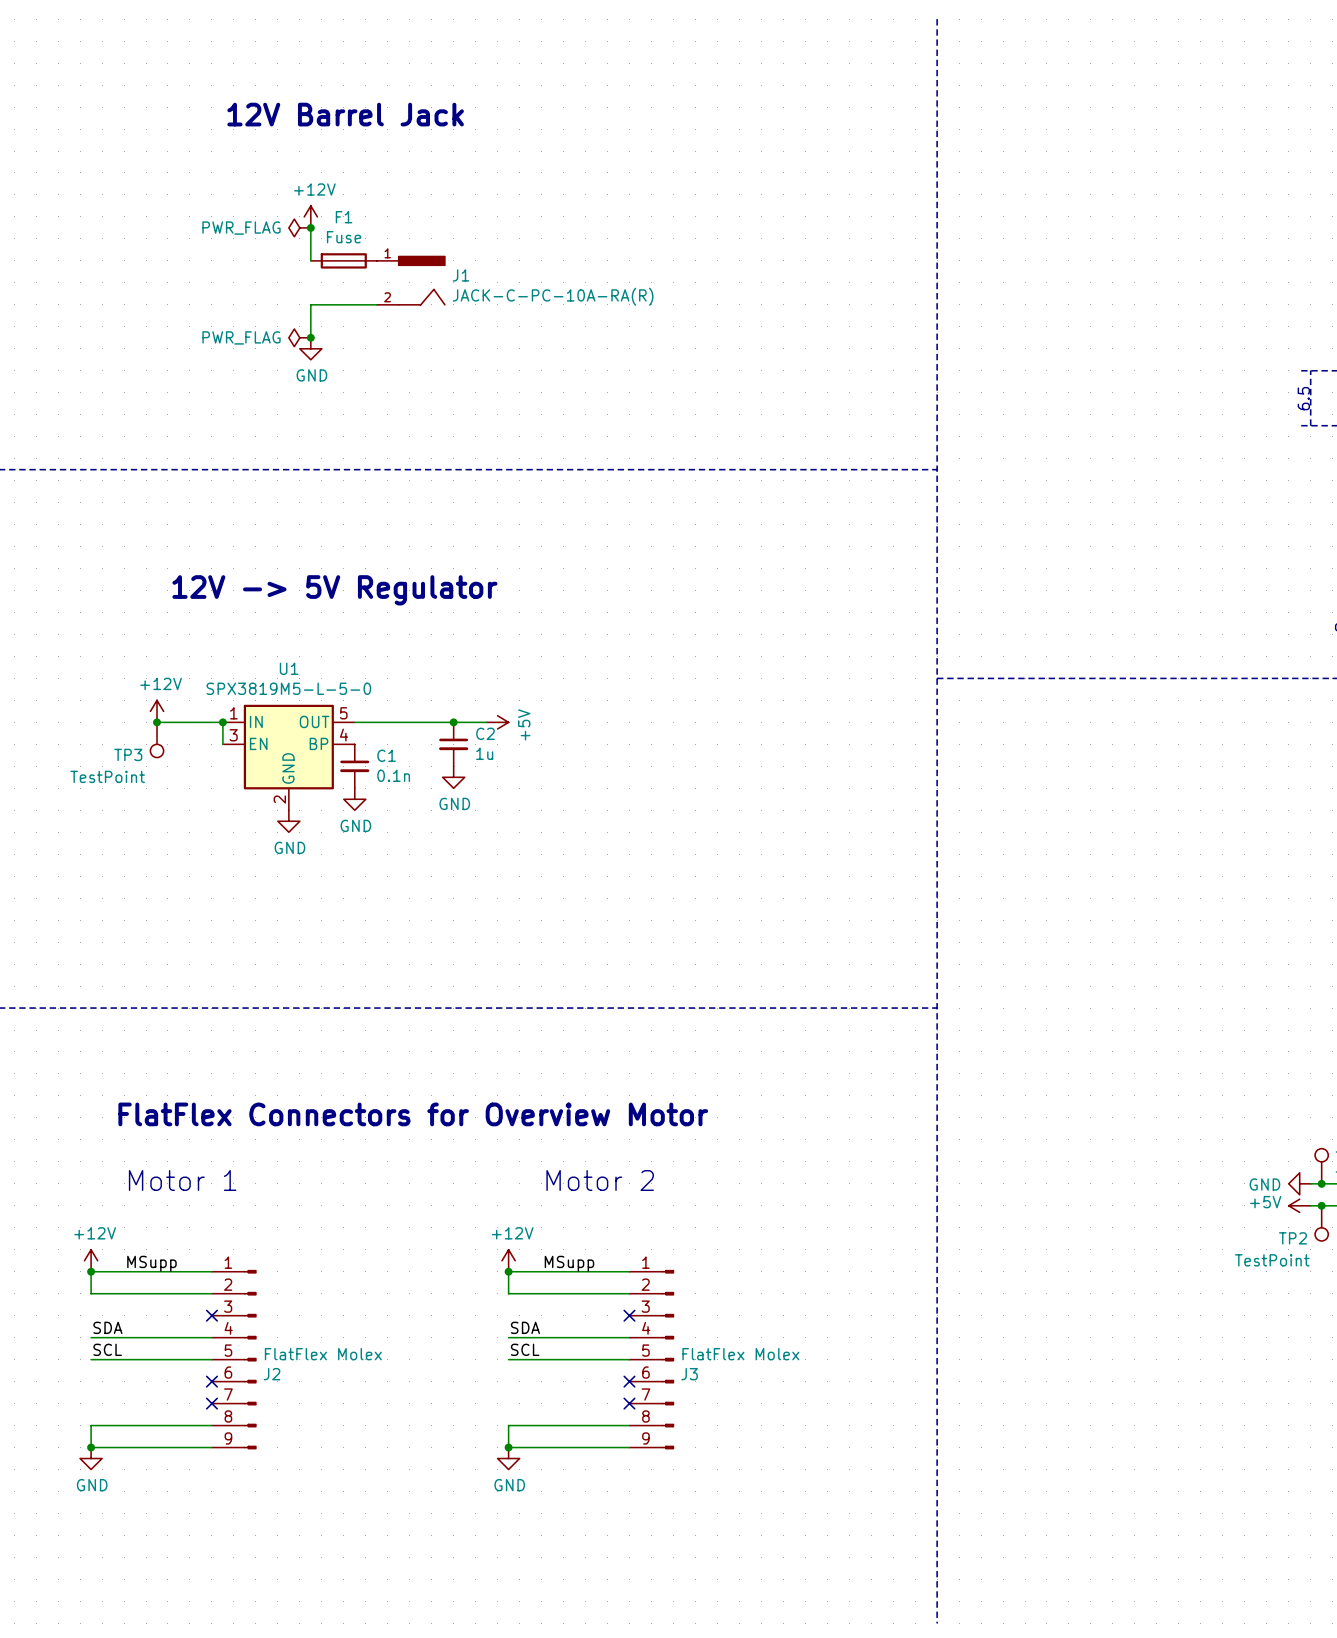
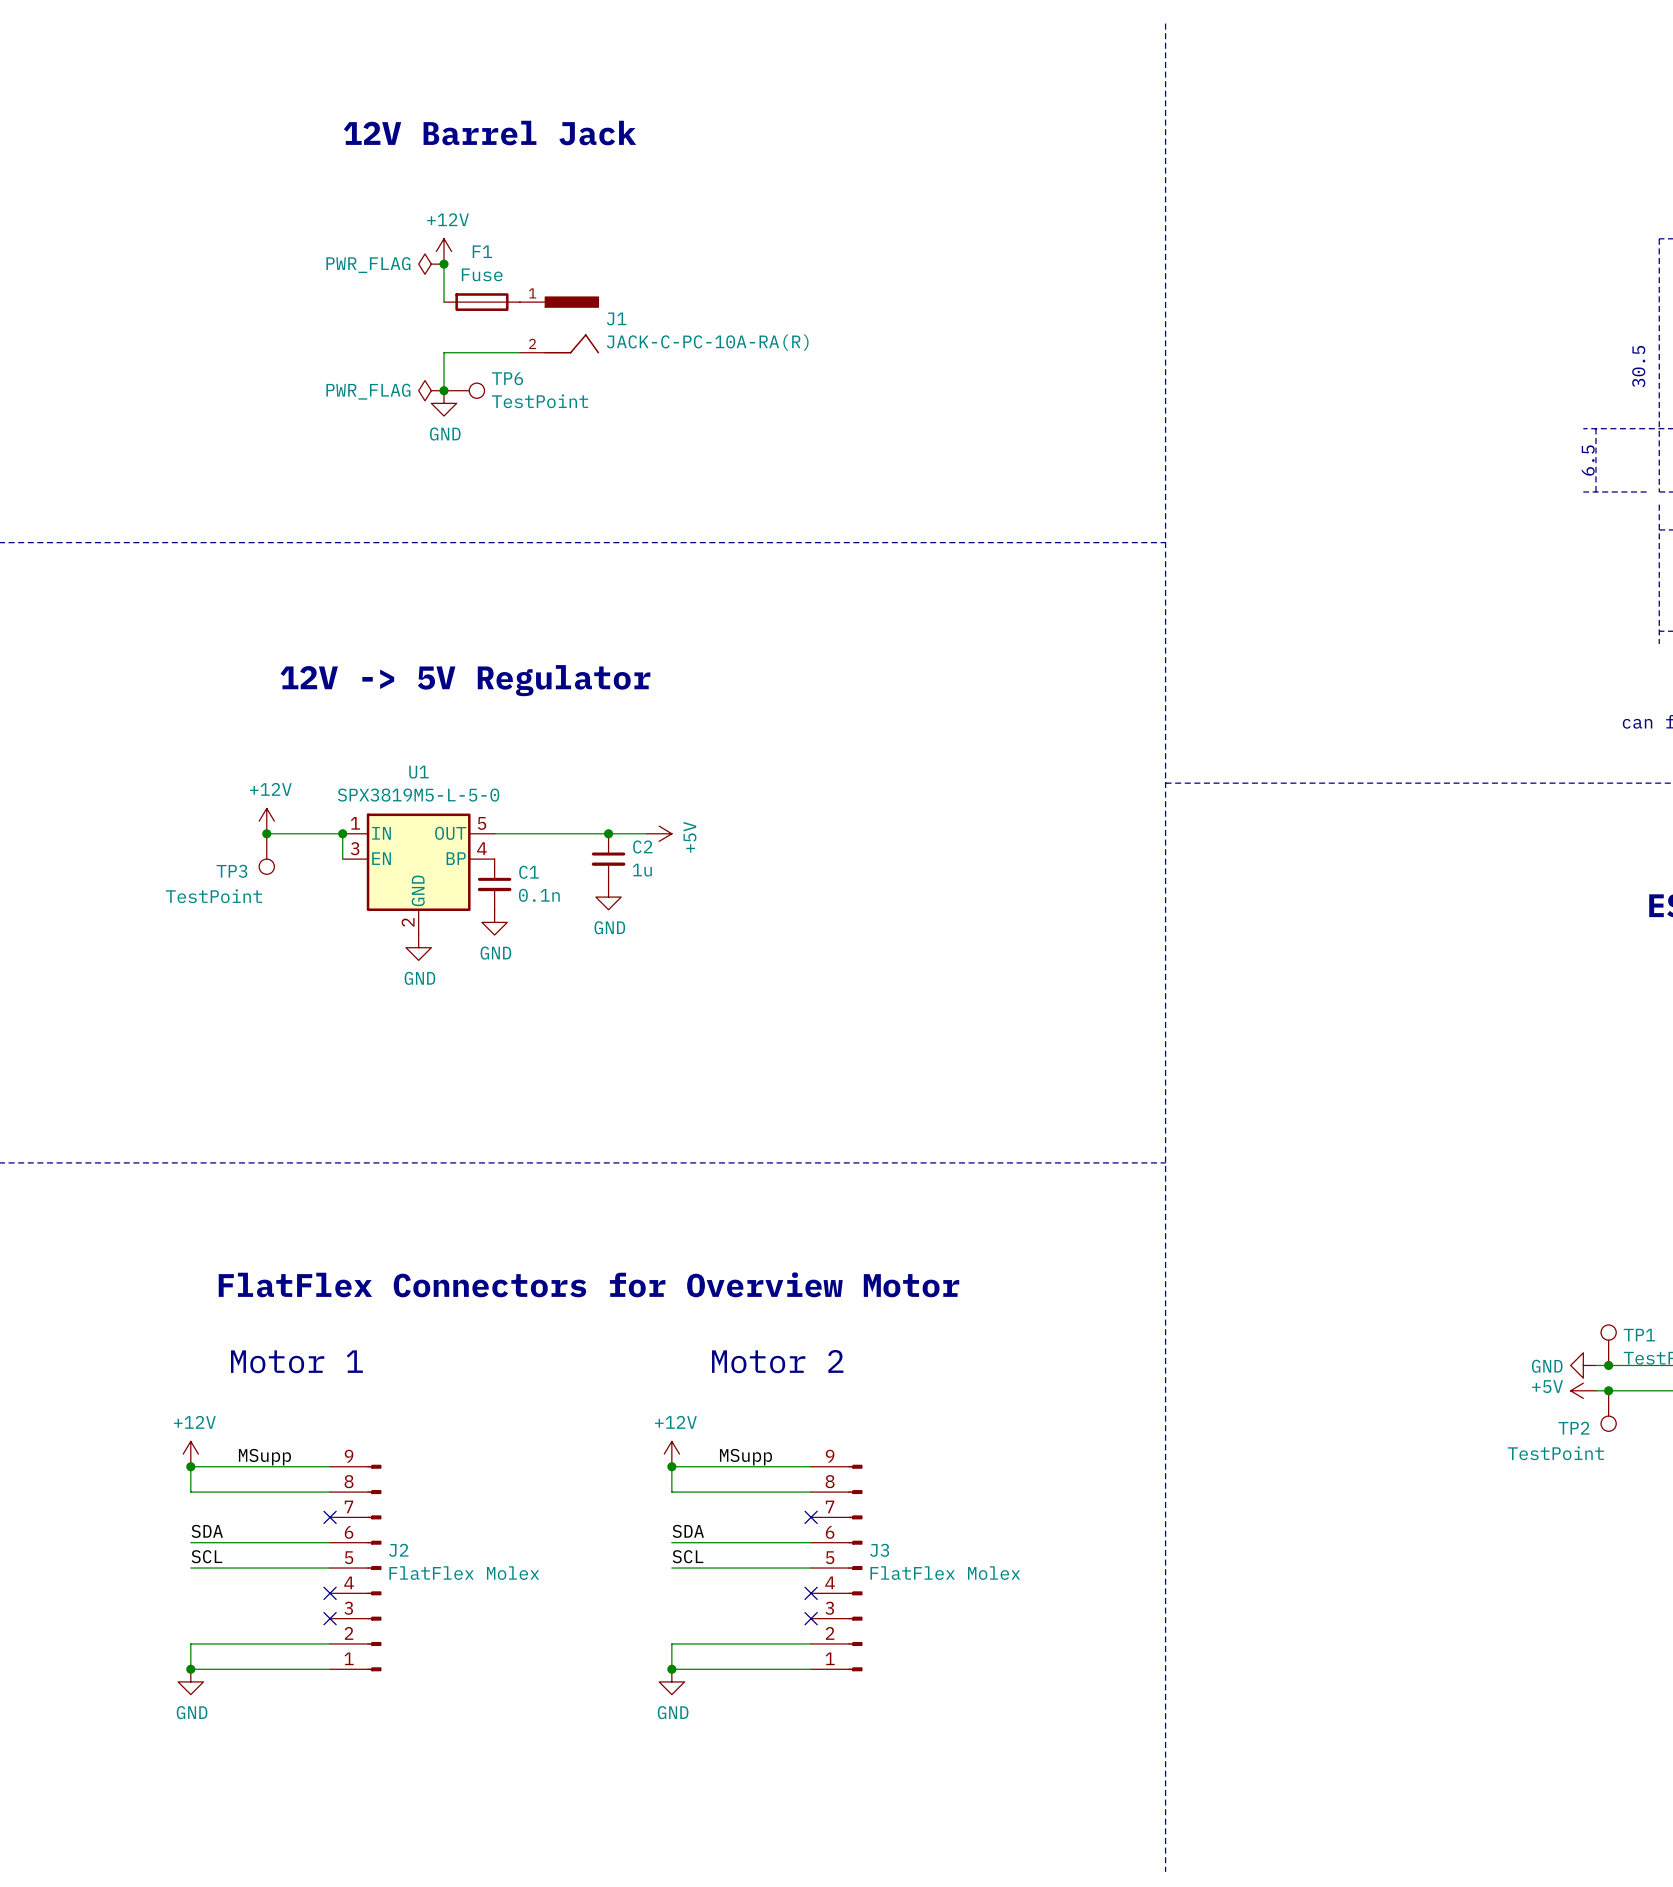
TP6: none -> TestPoint (464, 390)
J2 flip: as is (250, 1359) -> up-down (374, 1568)
J3 flip: as is (667, 1359) -> up-down (855, 1568)

